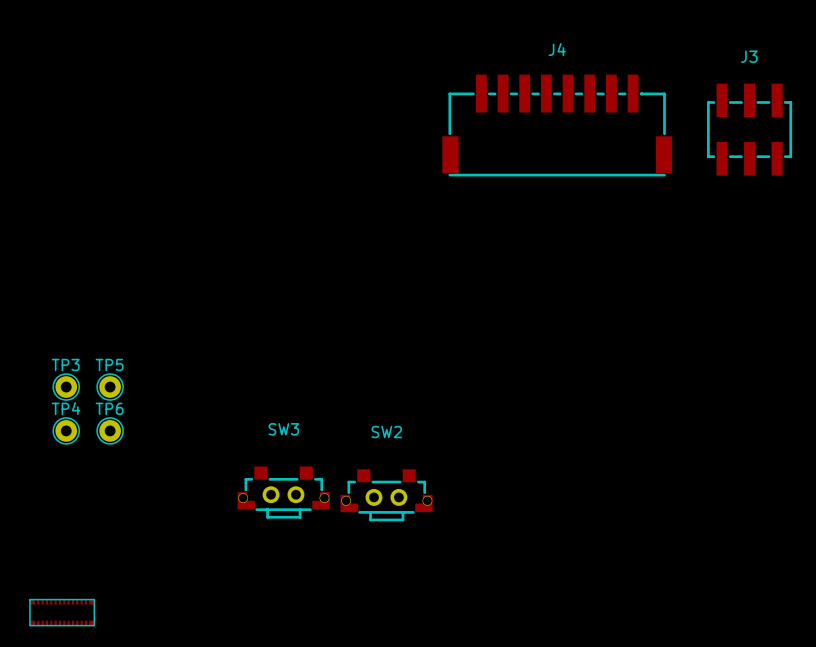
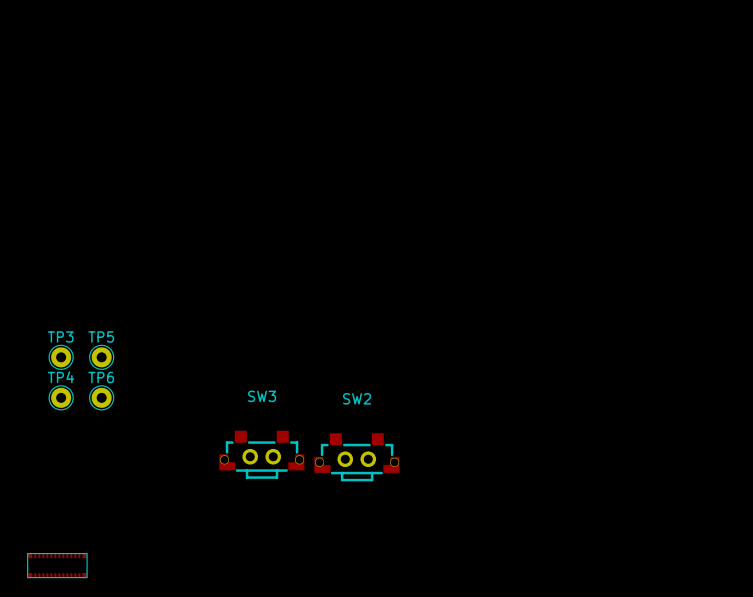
J4: (557, 125) -> none
J3: (749, 129) -> none

